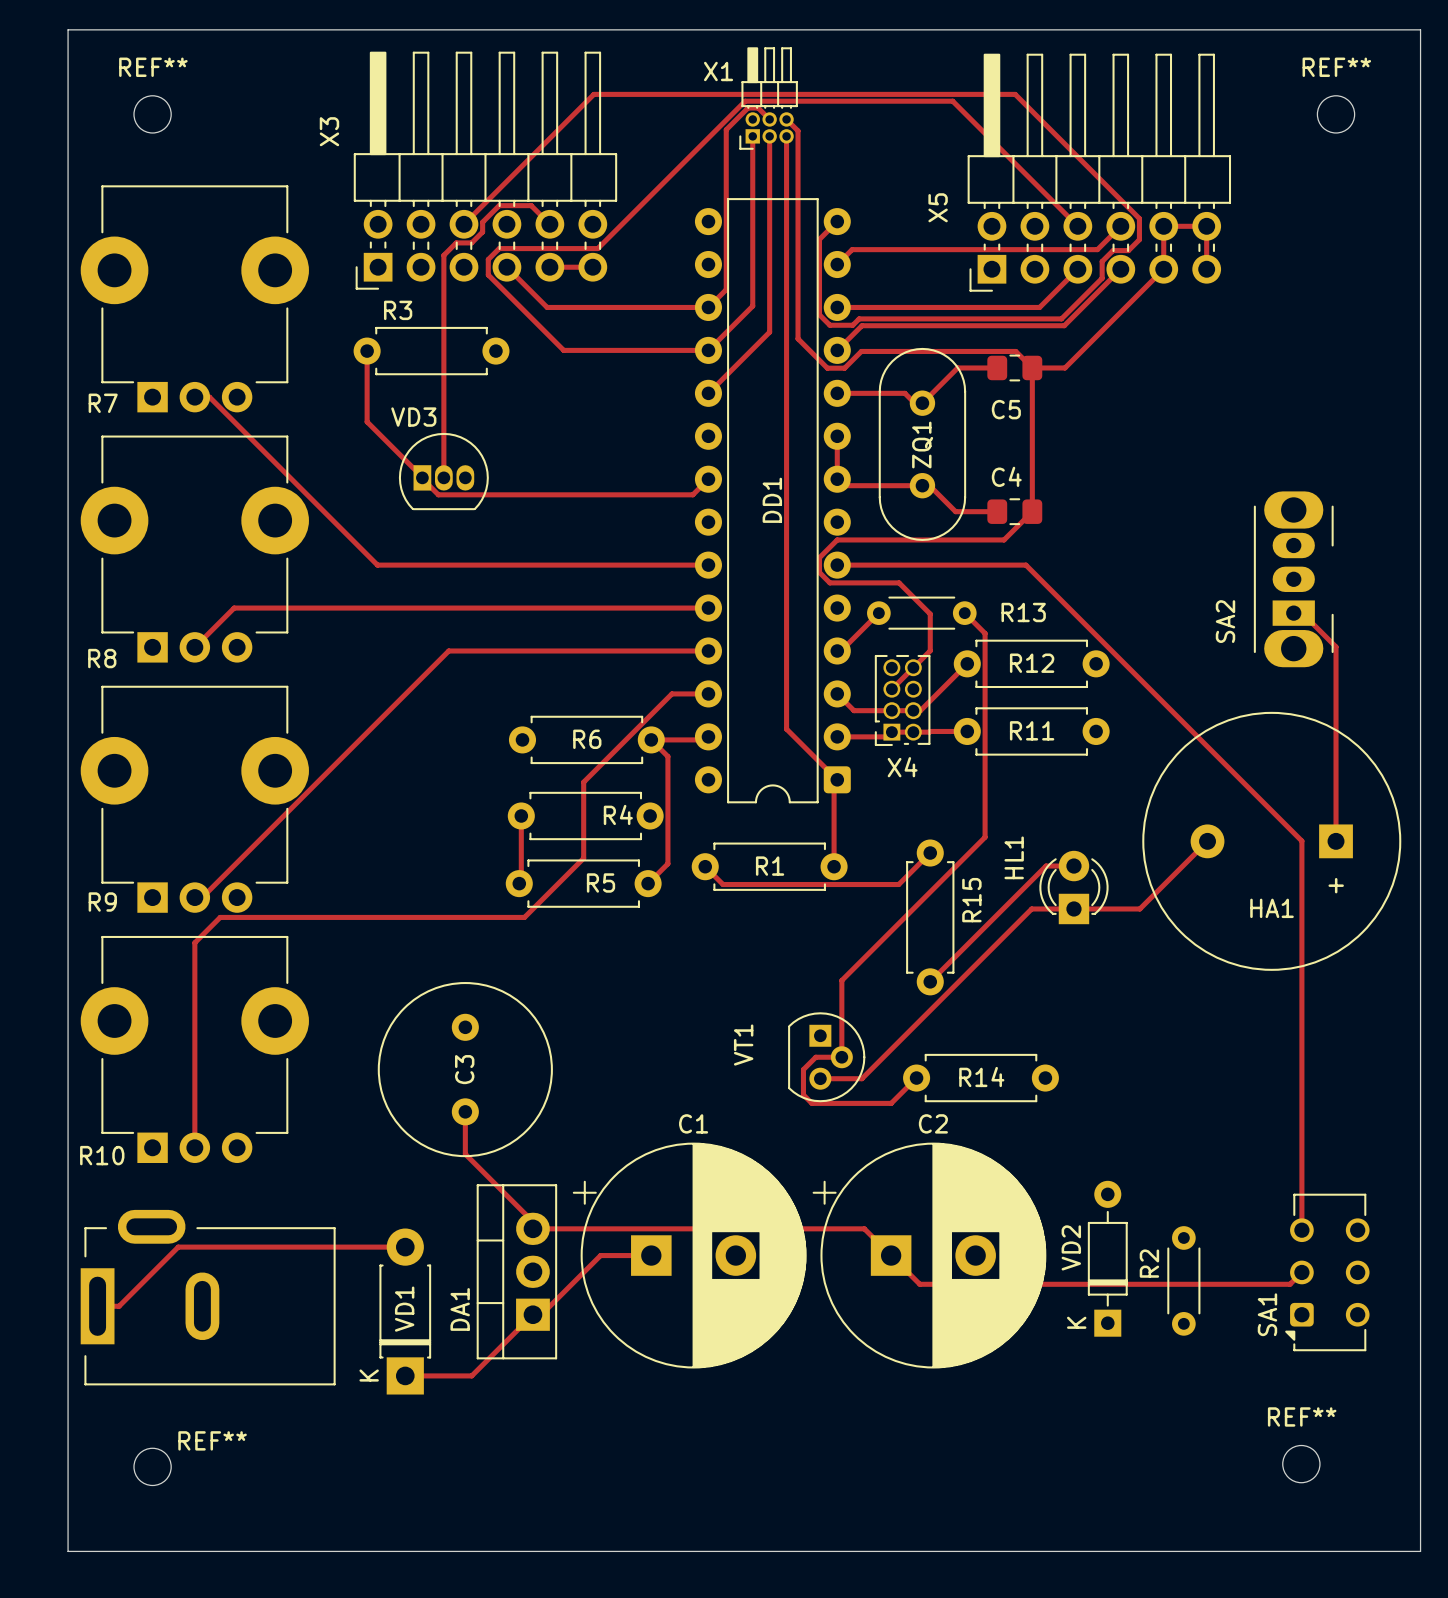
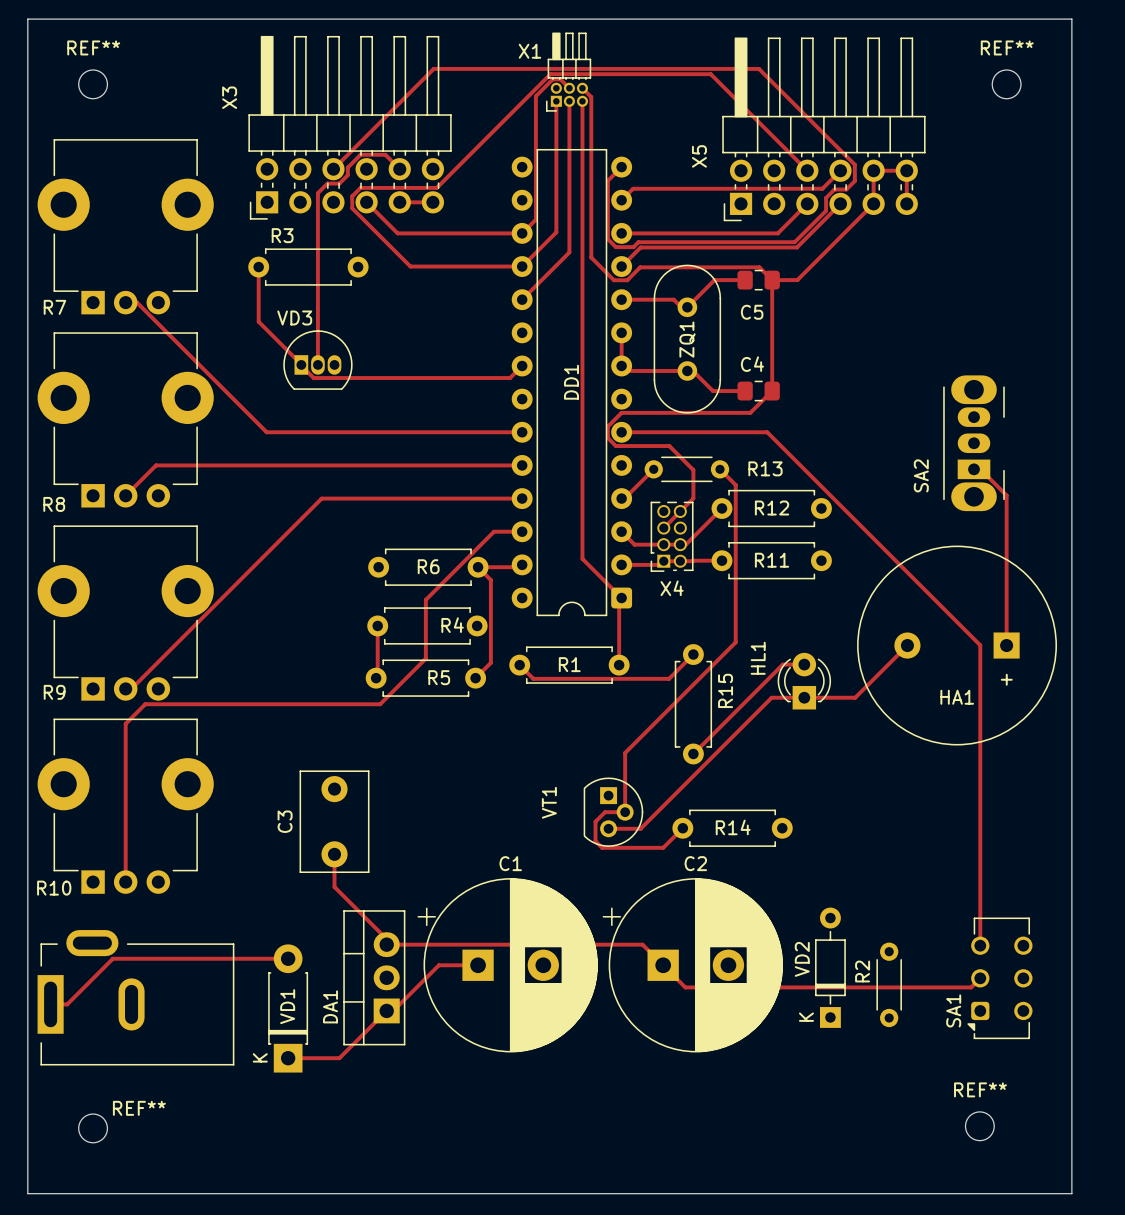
C3 footprint: [377, 982, 553, 1158] -> [299, 770, 370, 874]
C3 name position: C3 (464, 1069) -> C3 (285, 821)

